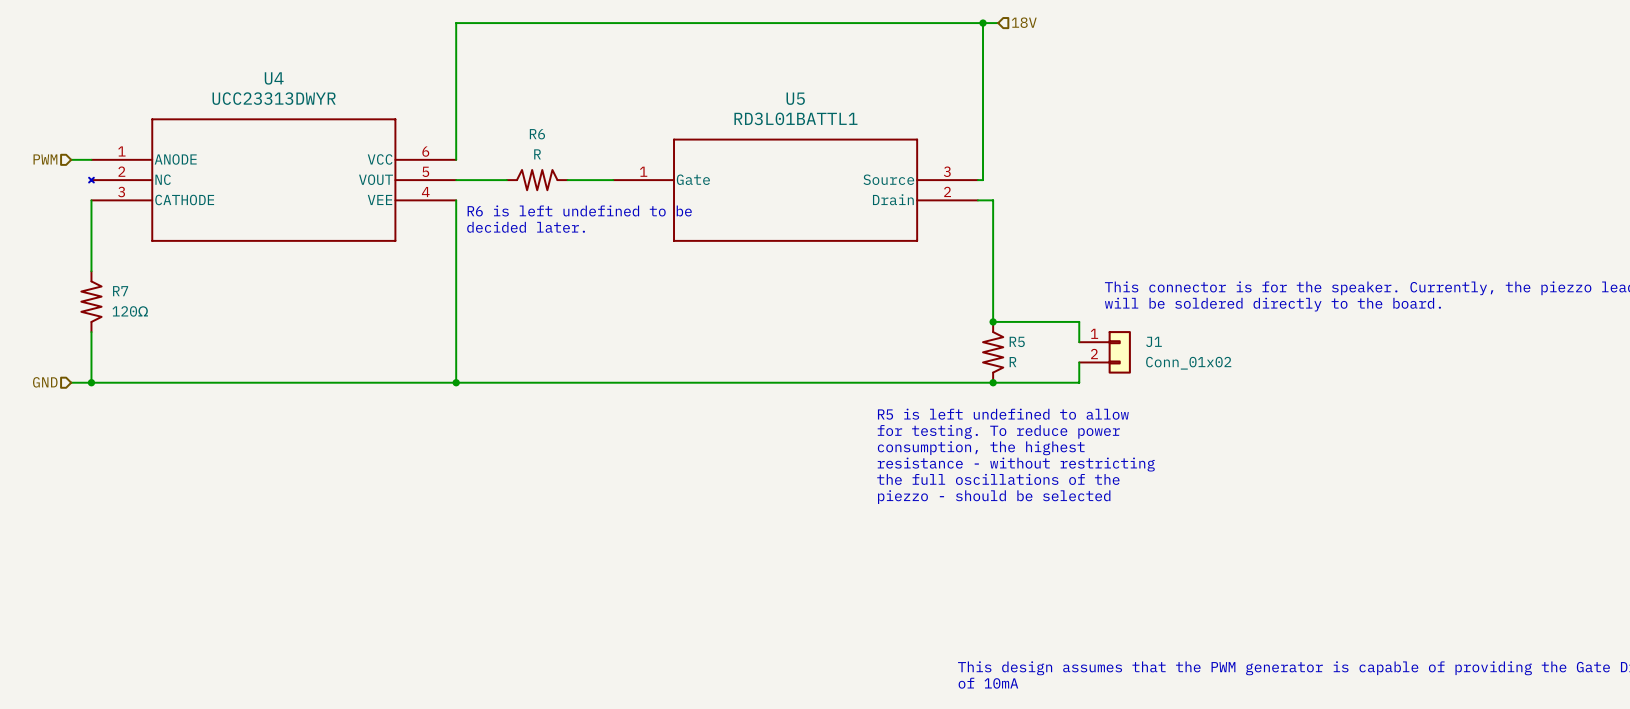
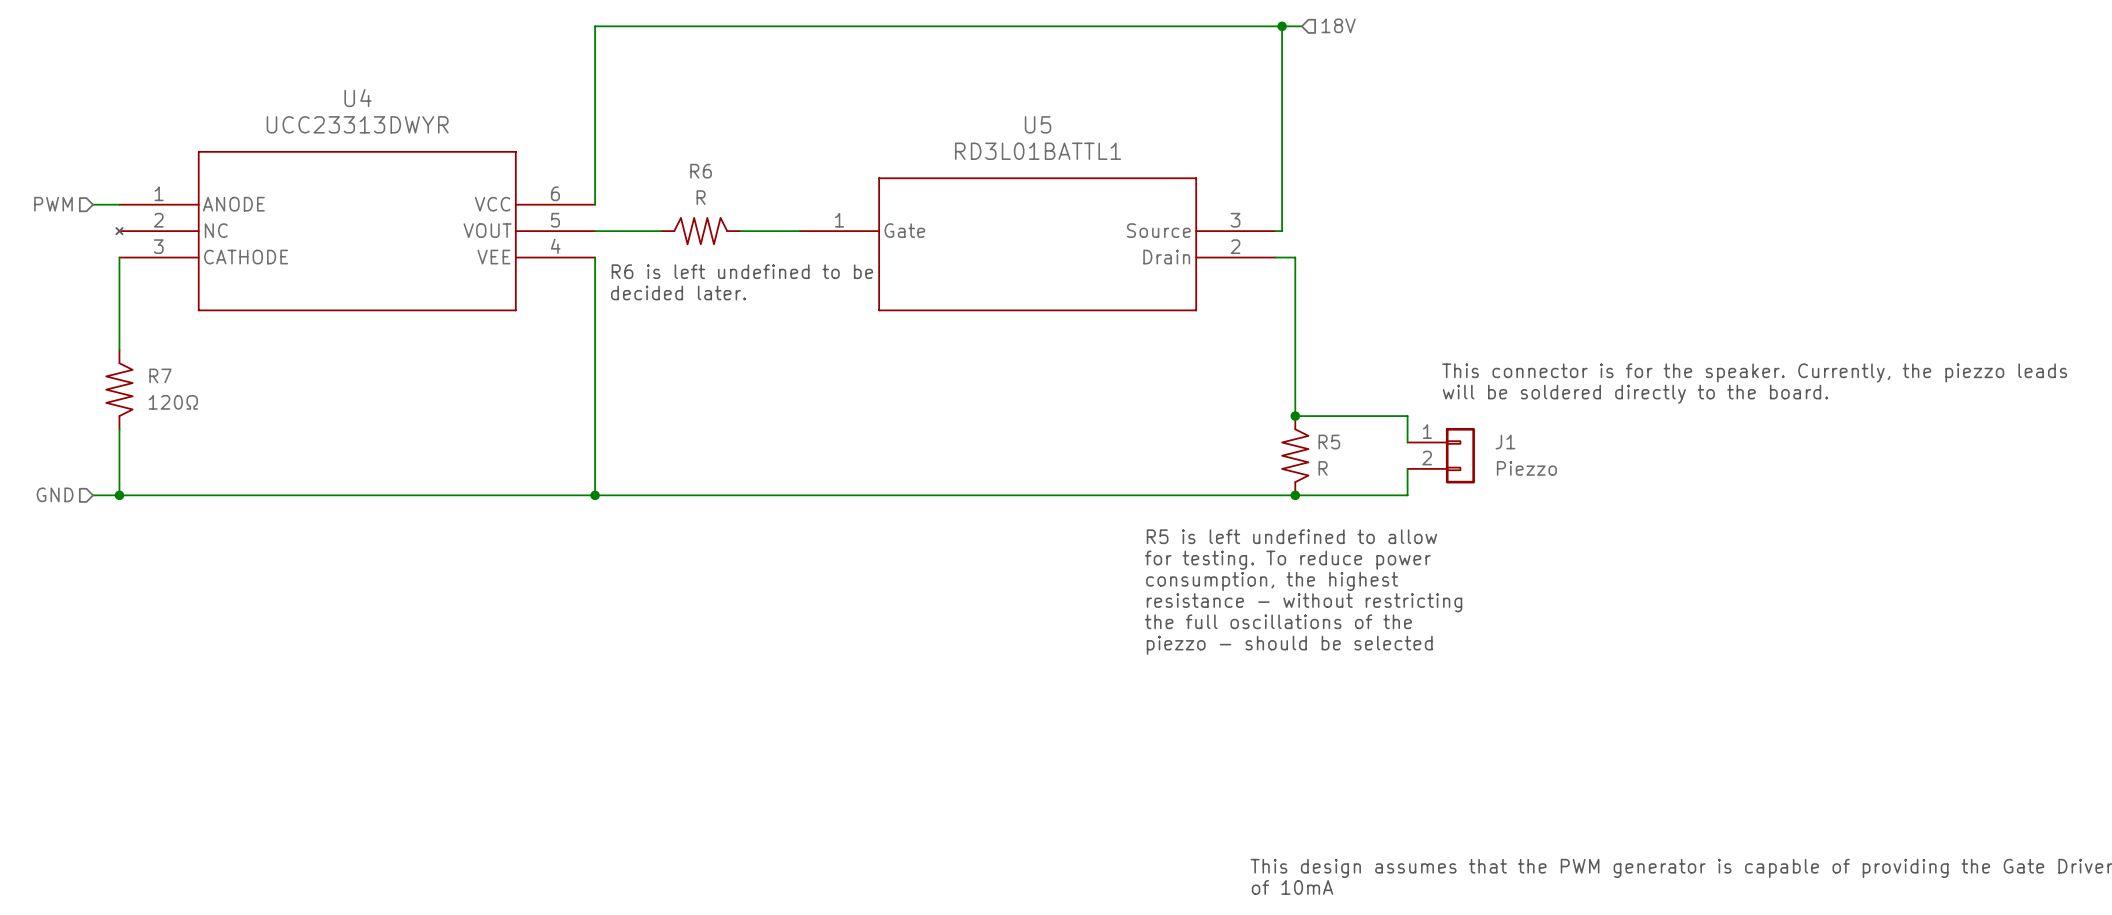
J1 value: Conn_01x02 (1188, 363) -> Piezzo (1526, 468)

